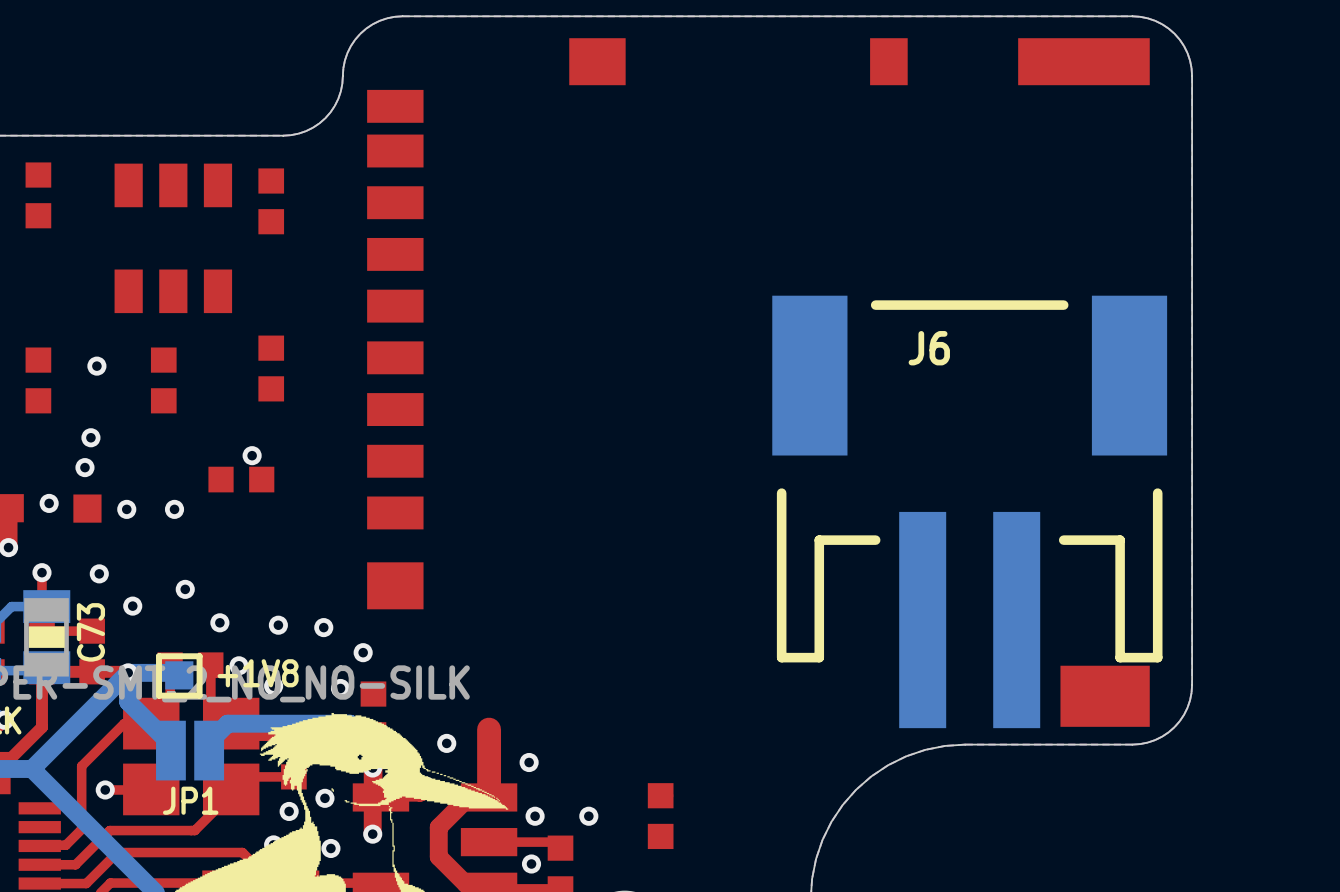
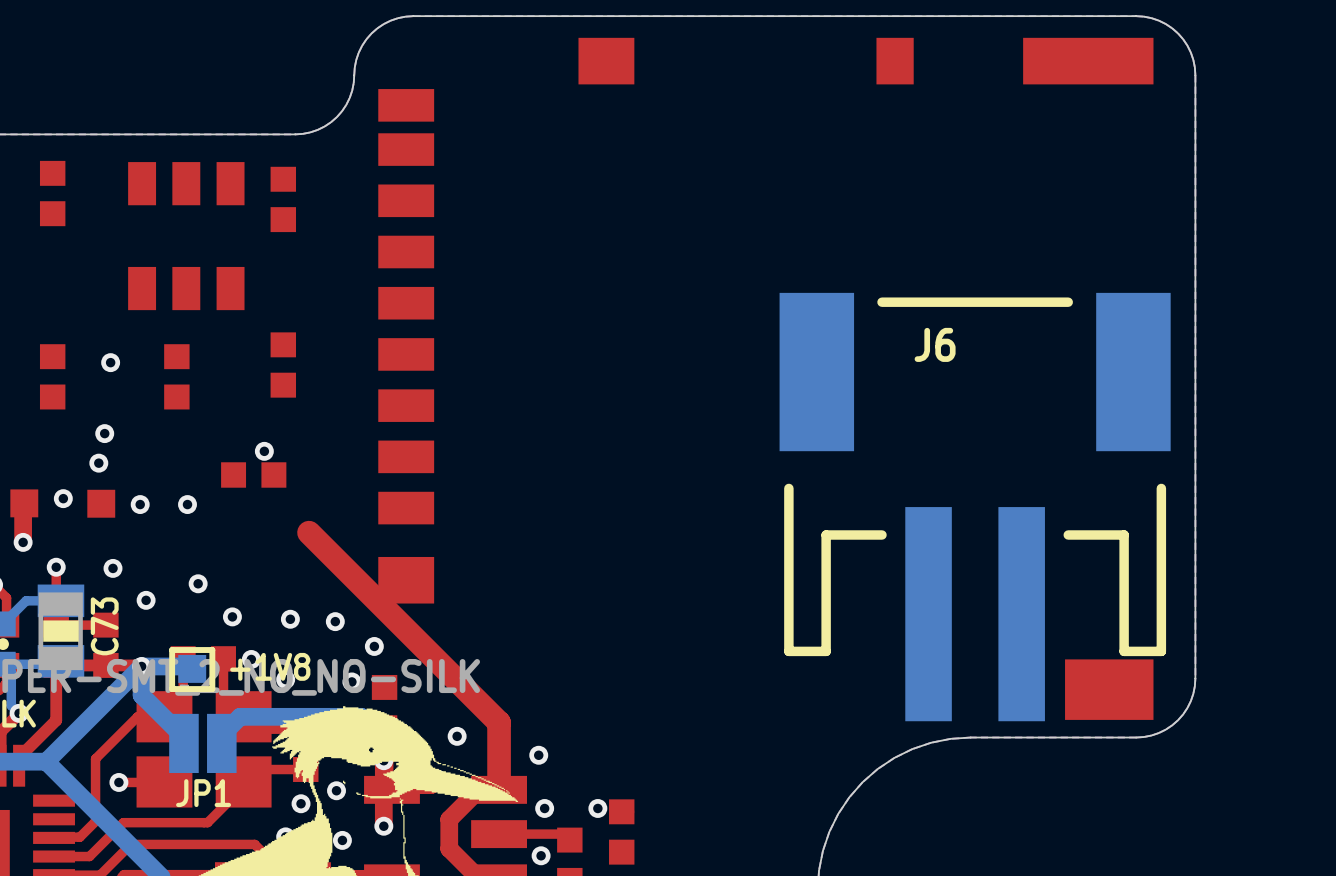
top track: none -> (309, 532) (499, 722)
part position: (660, 816) -> (621, 831)

